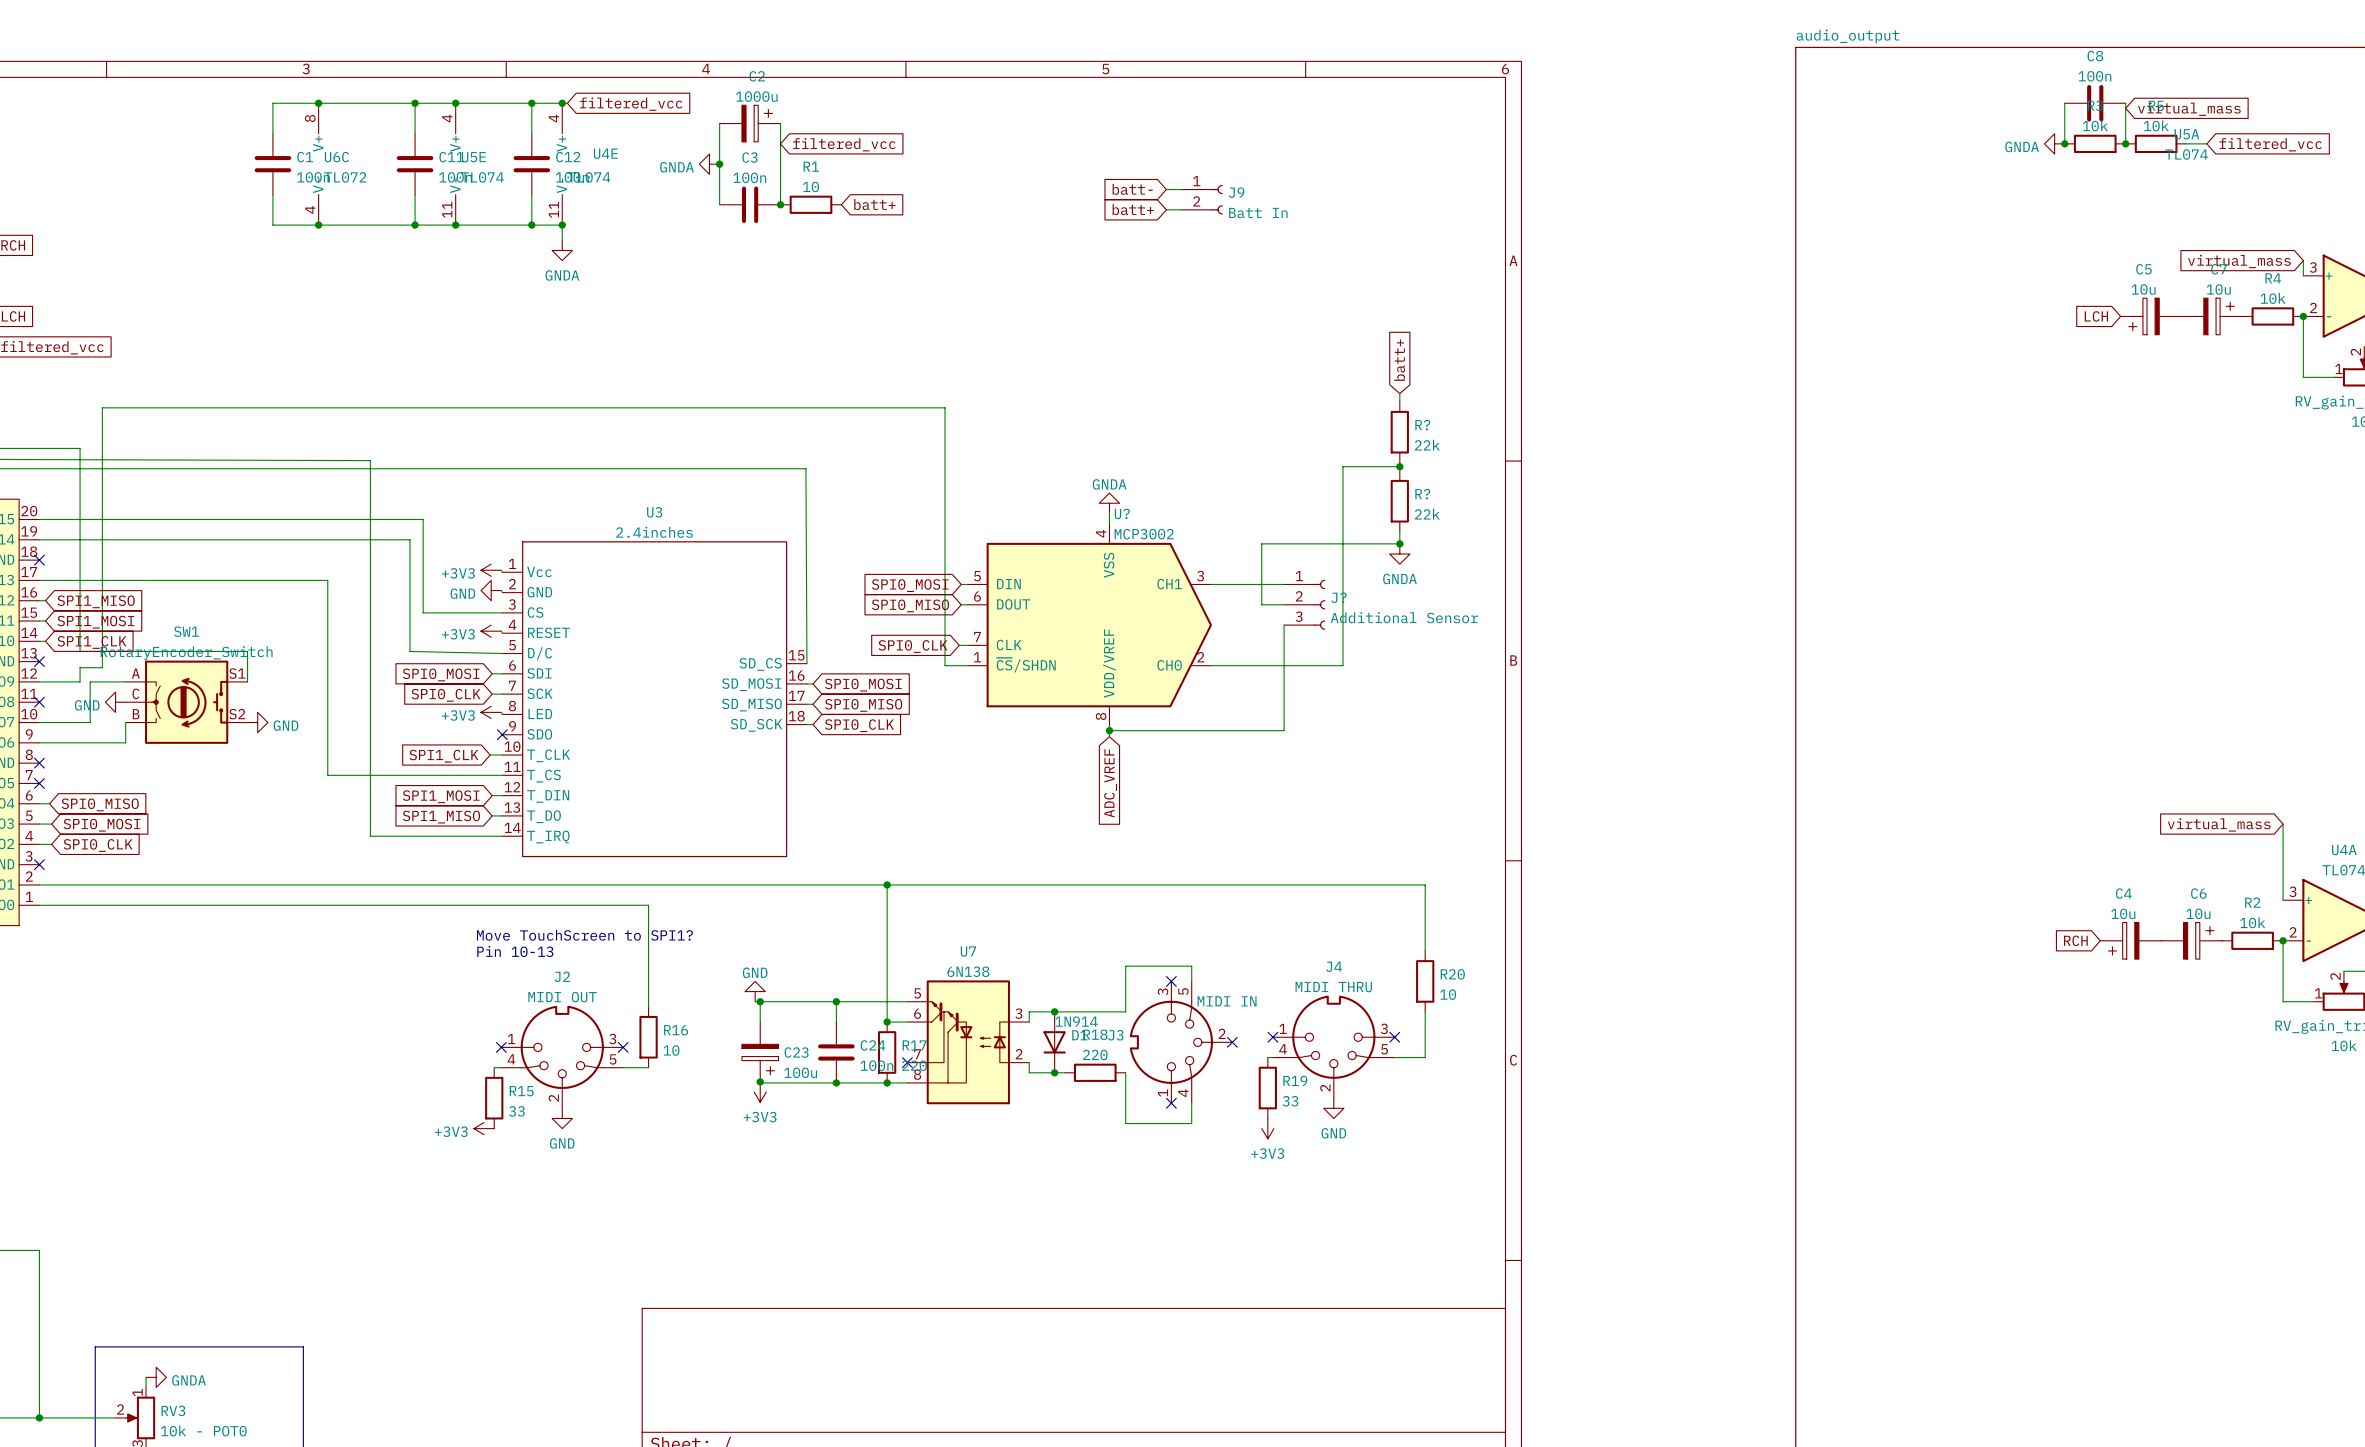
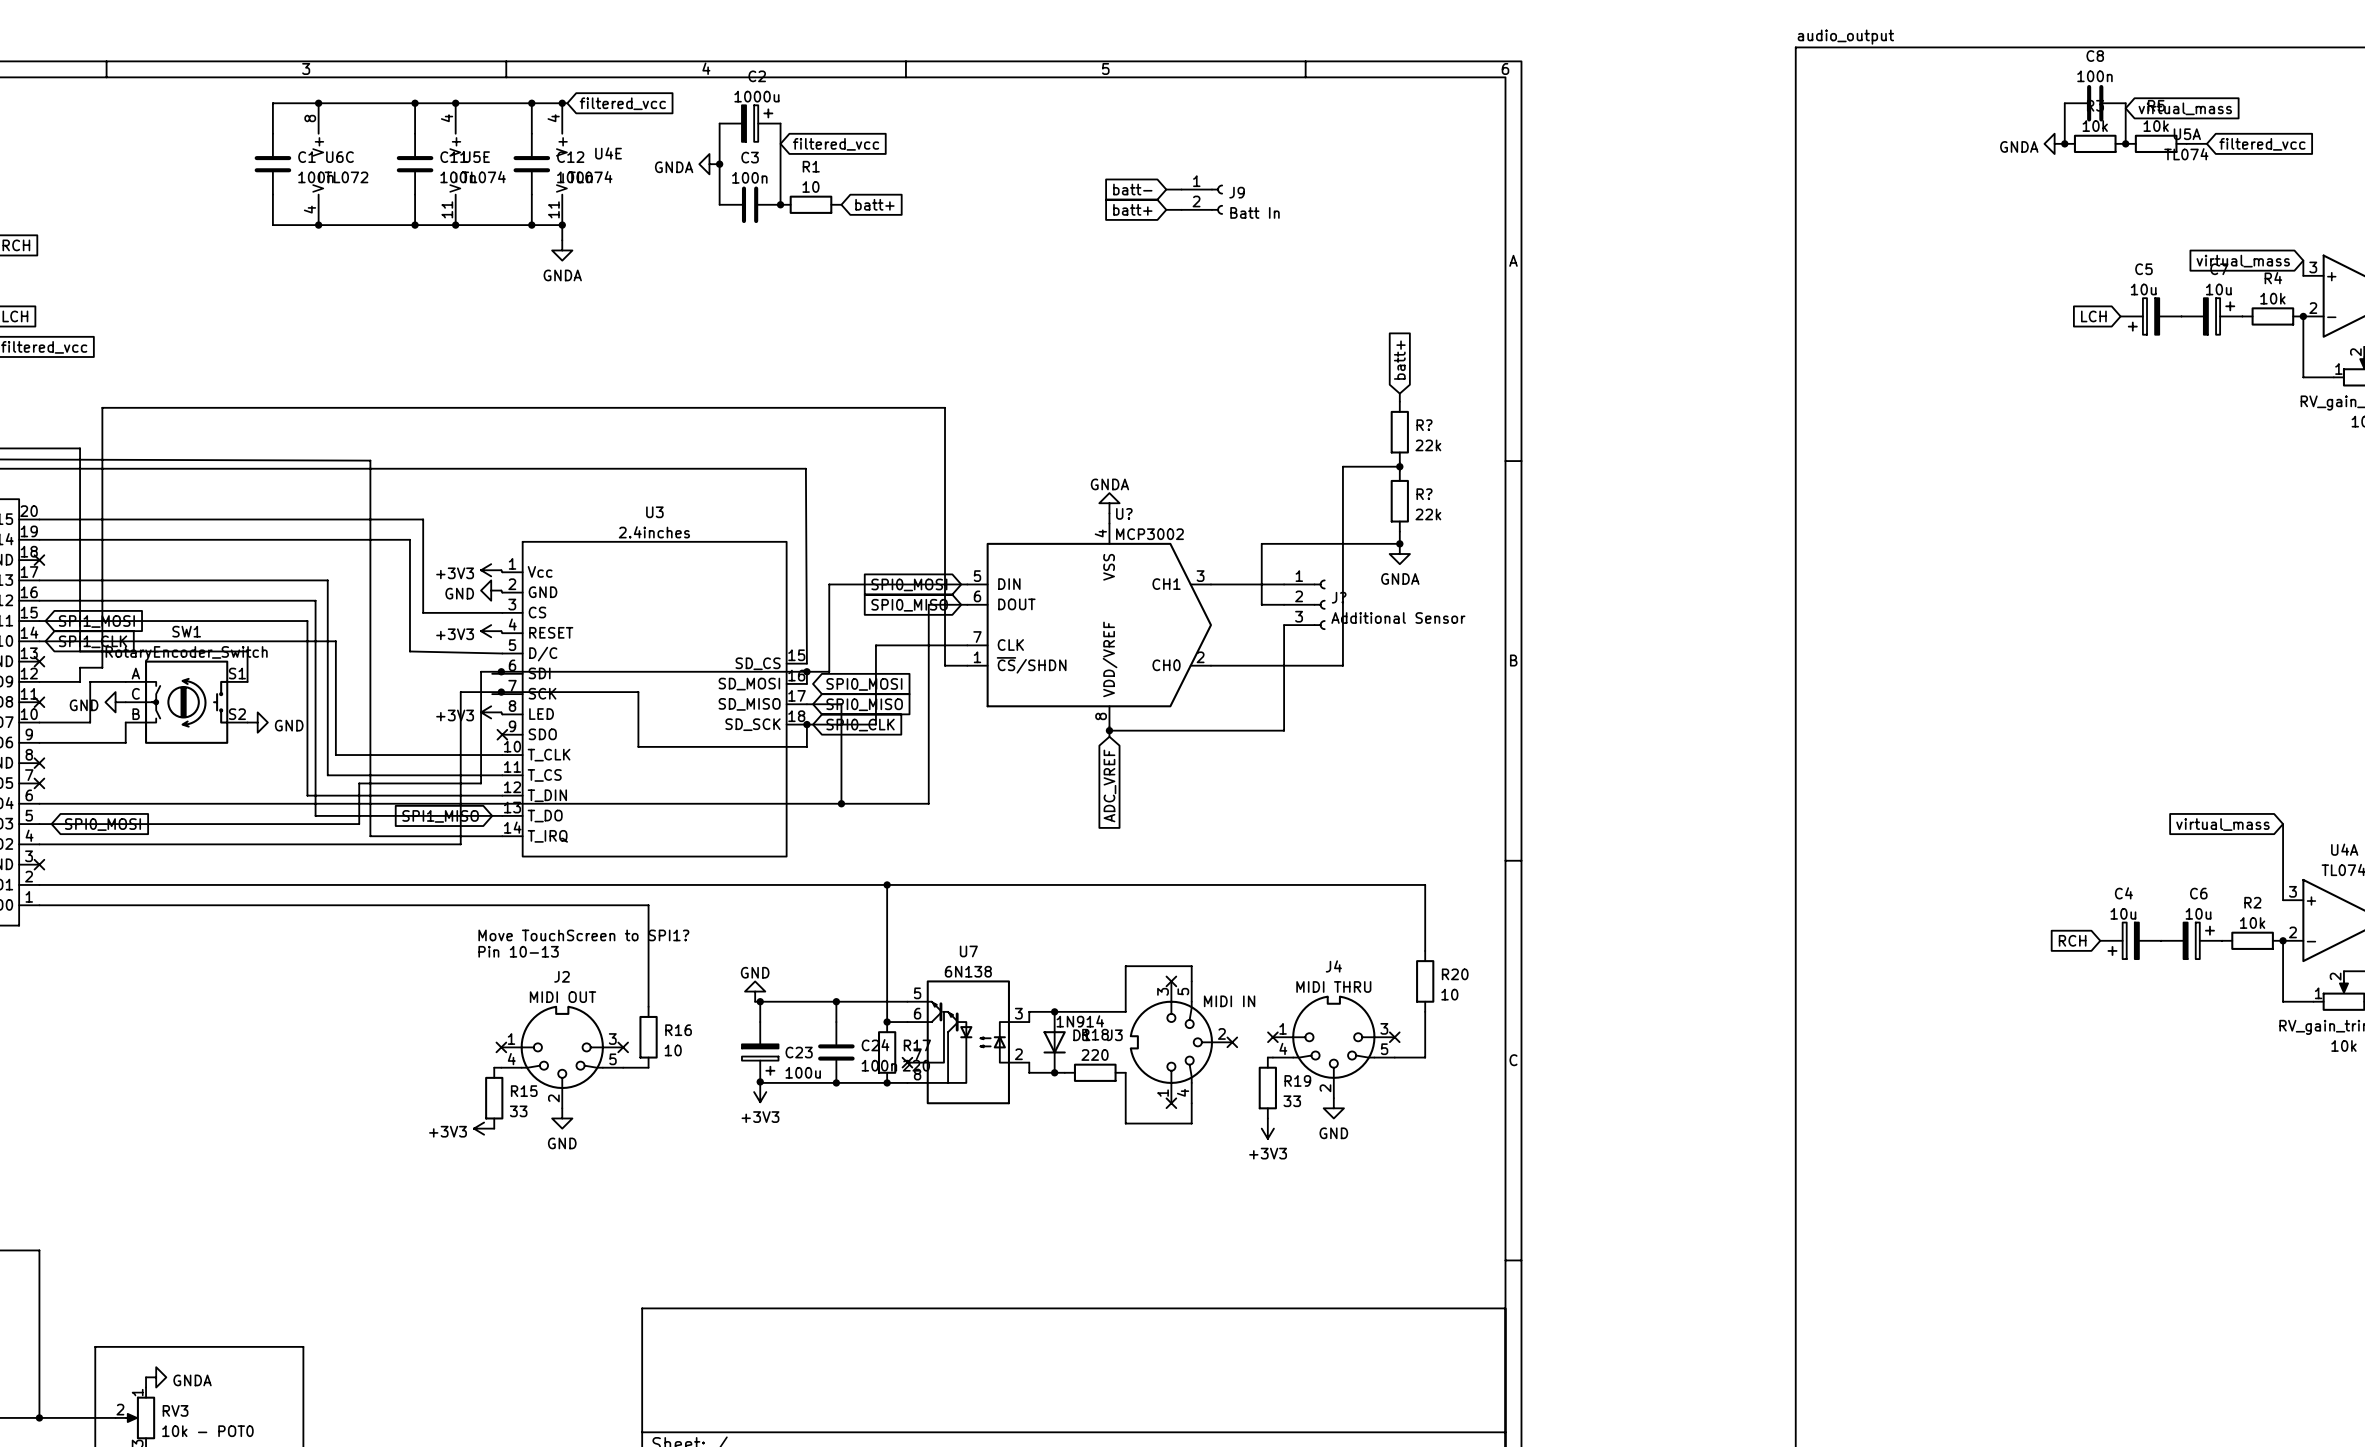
wire: none -> (961, 584) (829, 584) (829, 671) (481, 671) (481, 783) (359, 783) (359, 824) (51, 824)
wire: none -> (45, 600) (315, 600) (315, 815) (492, 815)
global label: SPI1_MISO (96, 601) -> none
wire: none -> (961, 604) (928, 604) (928, 803) (49, 803)
wire: none -> (45, 621) (307, 621) (307, 795) (492, 795)
wire: none -> (45, 641) (335, 641) (335, 755) (490, 755)
wire: none -> (959, 645) (875, 645) (875, 724) (813, 724)
global label: SPI0_CLK (913, 646) -> none
junction: none -> (501, 671)
junction: none -> (806, 671)
global label: SPI0_MOSI (441, 674) -> none
wire: (806, 683) (813, 683) -> (806, 683) (806, 671)
junction: none -> (501, 692)
global label: SPI0_CLK (446, 695) -> none
wire: none -> (813, 704) (841, 704) (841, 803)
wire: none -> (806, 724) (806, 746) (638, 746) (638, 692) (460, 692) (460, 844) (51, 844)
junction: none -> (806, 724)
global label: SPI1_CLK (444, 756) -> none
global label: SPI1_MOSI (441, 796) -> none
junction: none -> (841, 803)
global label: SPI0_MISO (100, 804) -> none
global label: SPI0_CLK (98, 845) -> none

